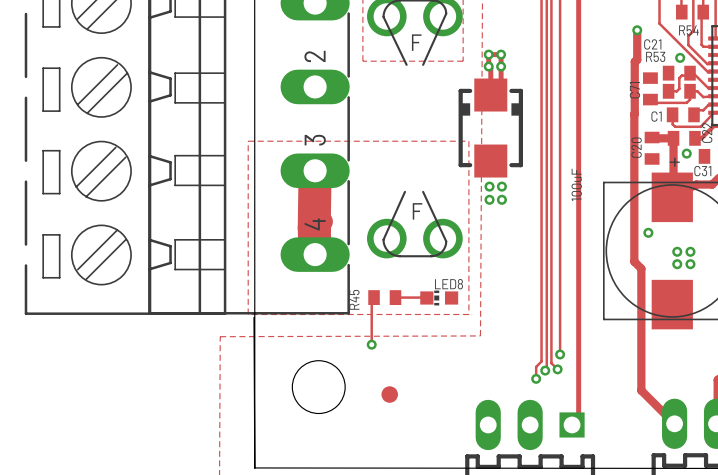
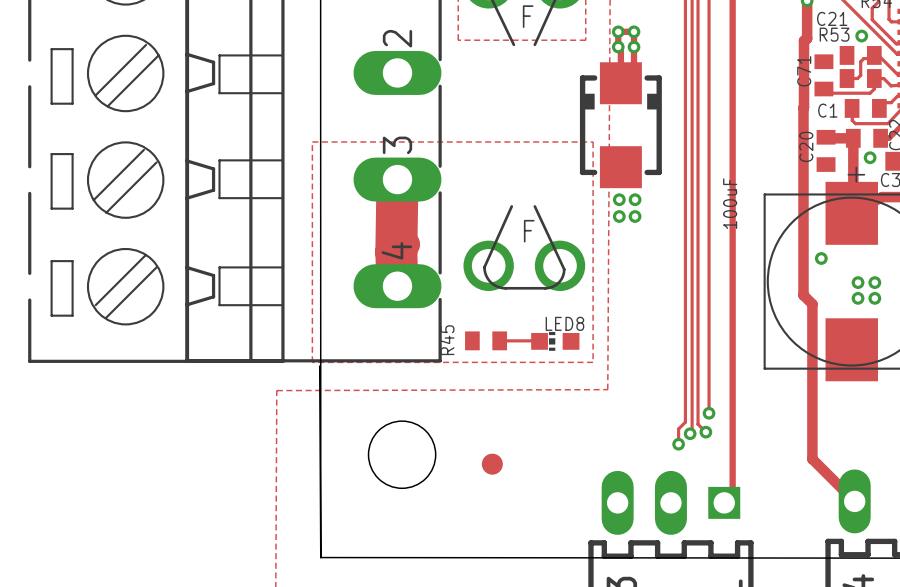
track: (374, 297) (371, 299) (371, 344) -> none
via: (371, 344) -> none

